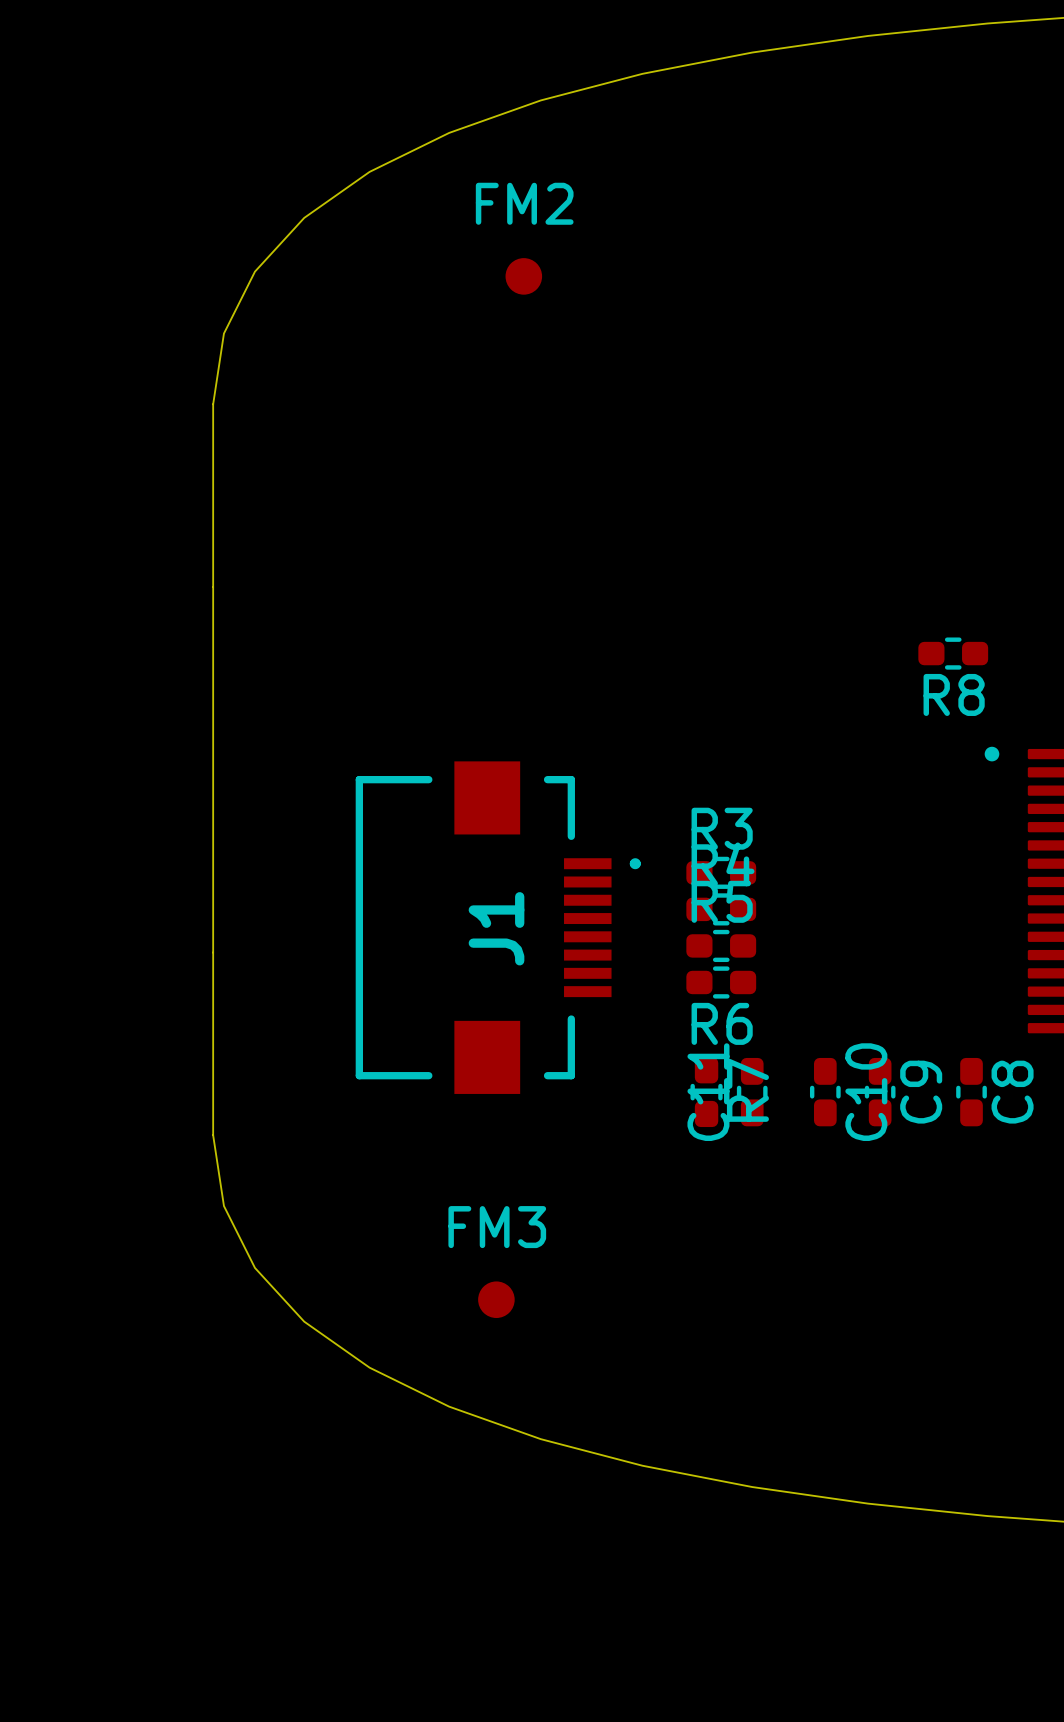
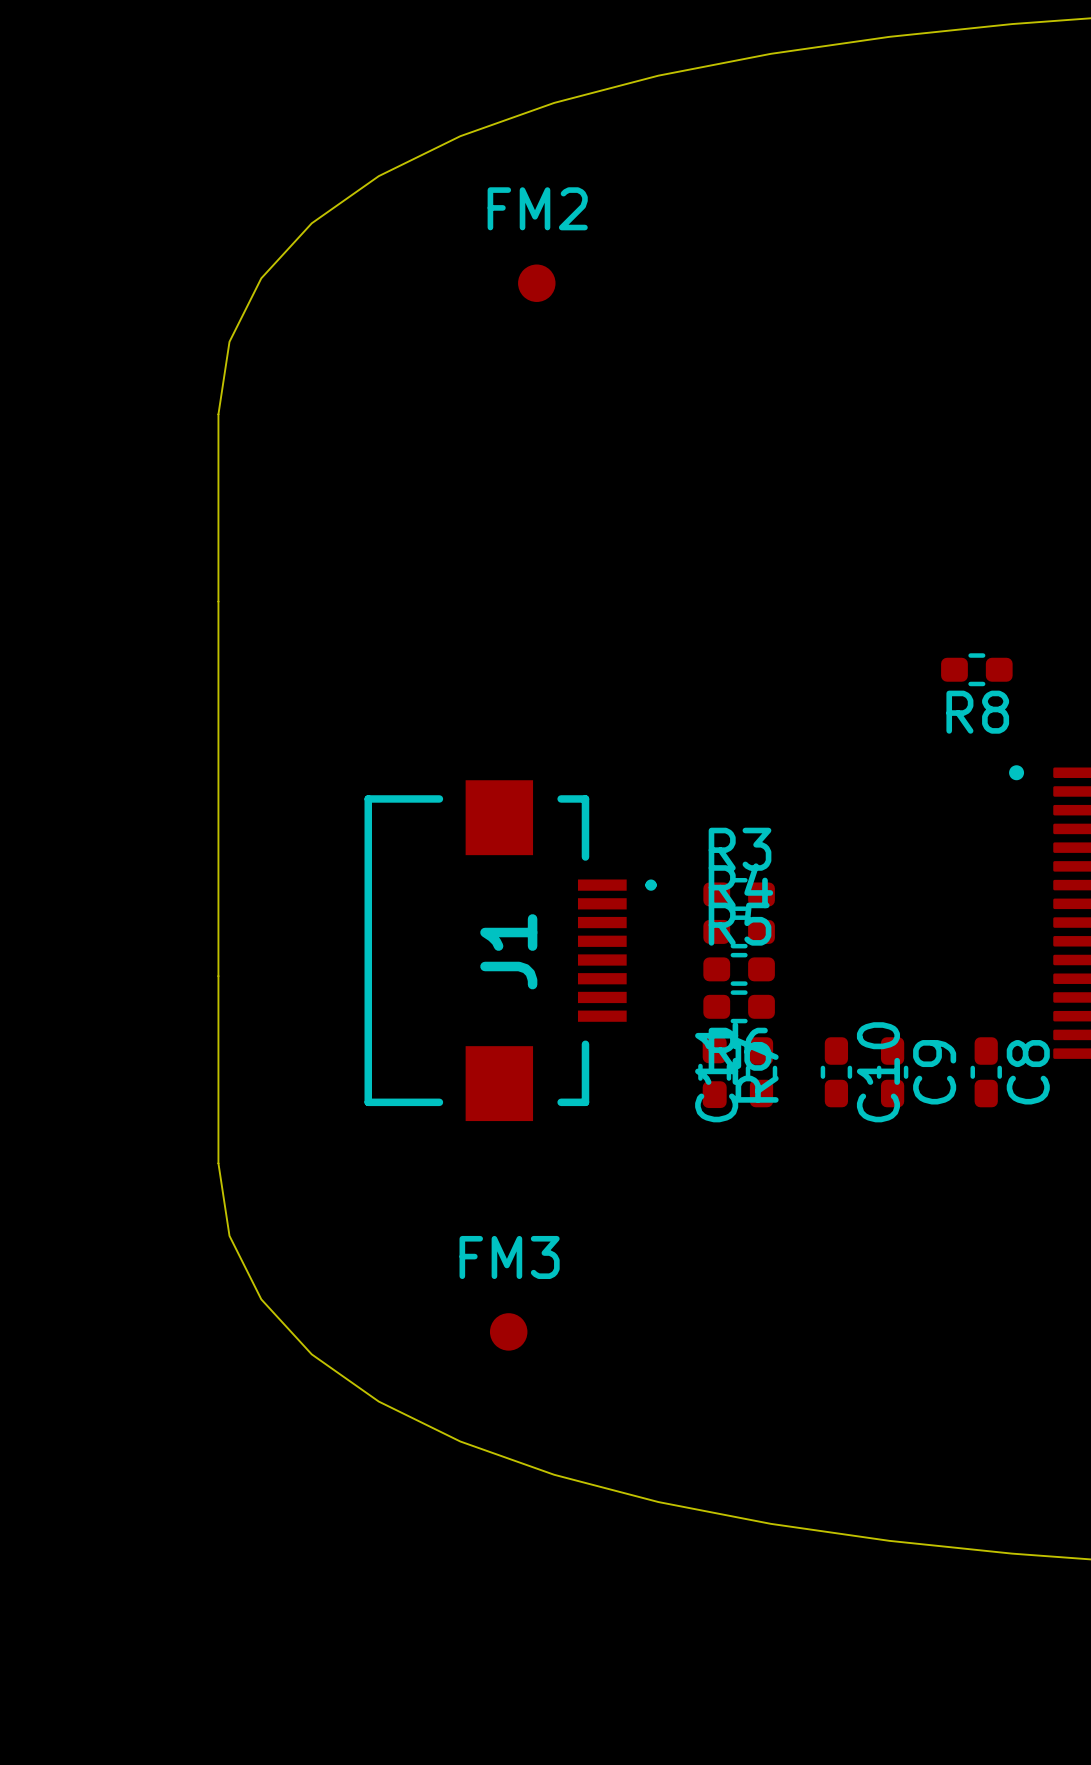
R7 position: (706, 1092) -> (714, 1072)
C11 position: (752, 1092) -> (761, 1072)
C10 position: (825, 1092) -> (836, 1072)
C9 position: (880, 1092) -> (892, 1072)
C8 position: (971, 1092) -> (986, 1072)

